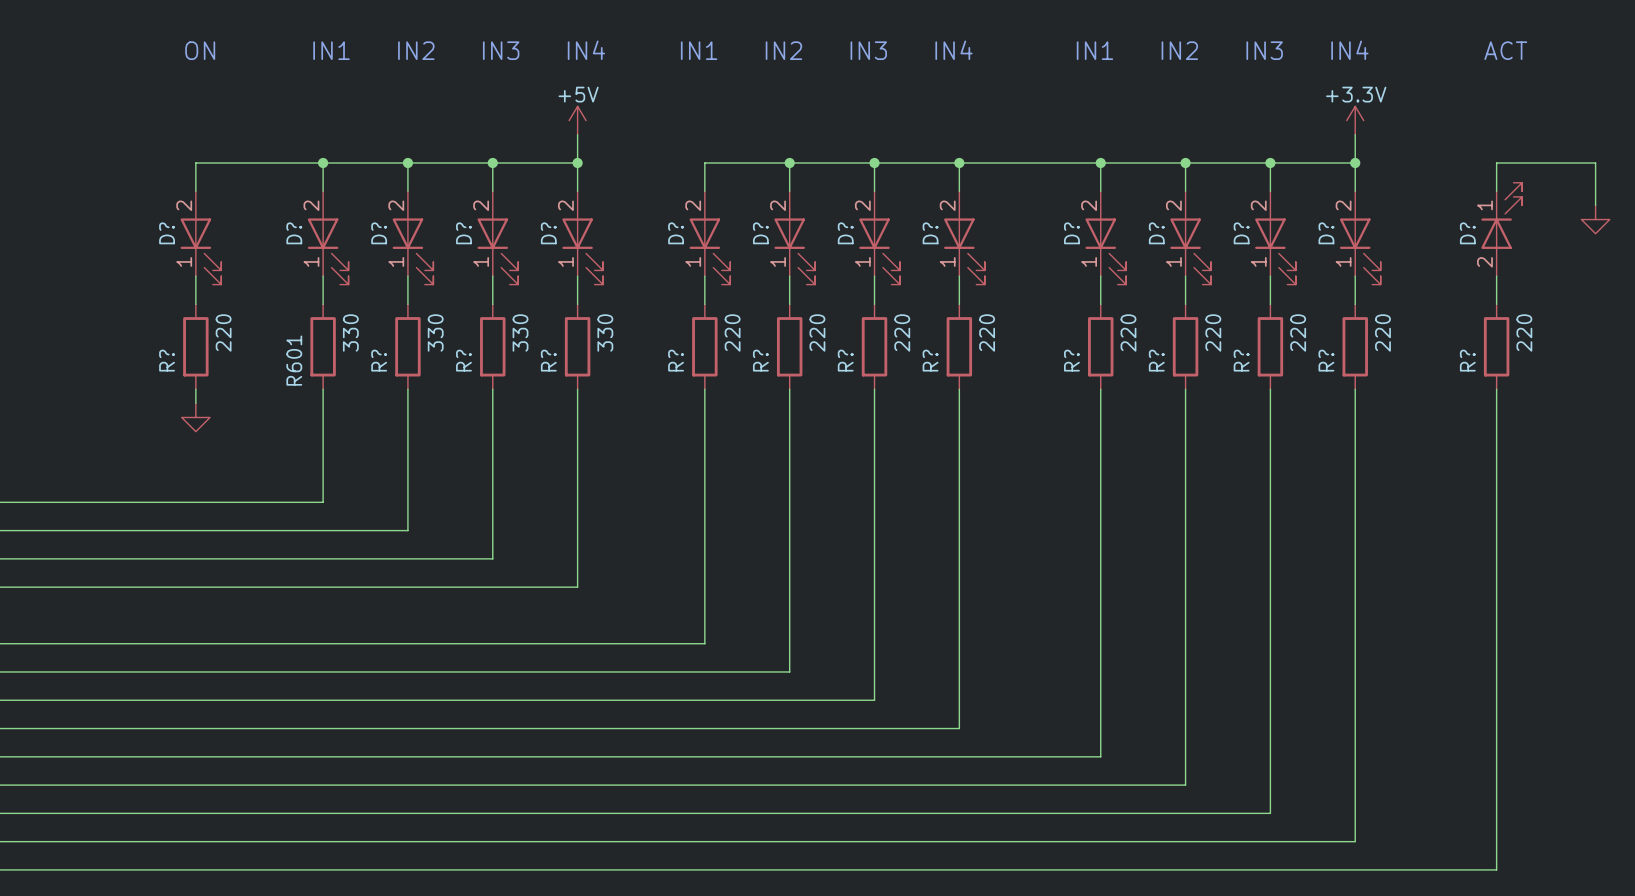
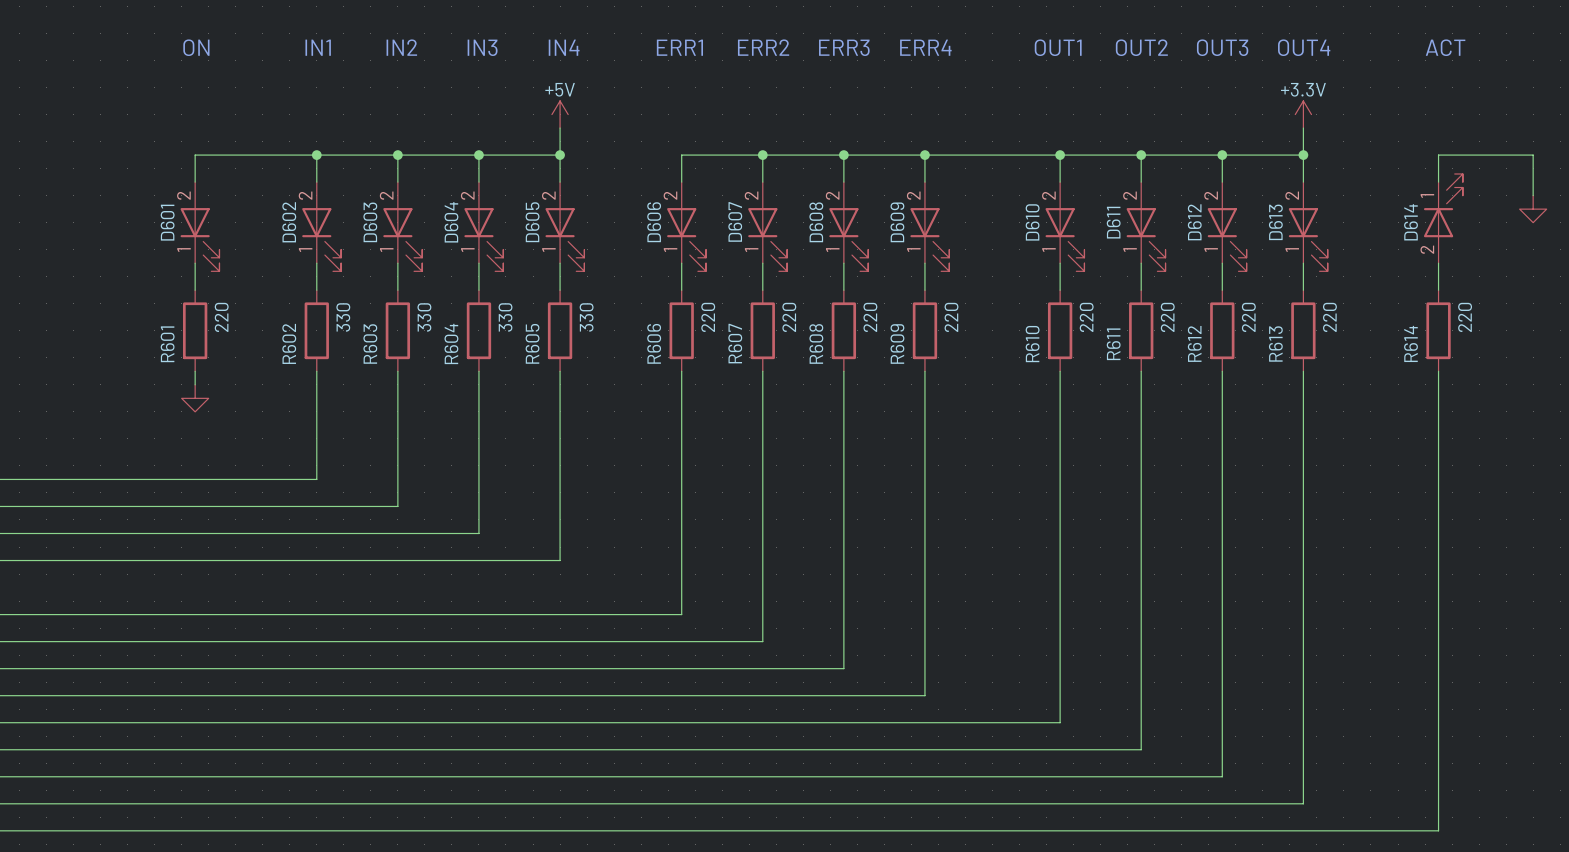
text: IN1 (699, 50) -> ERR1 (679, 47)
text: IN2 (783, 50) -> ERR2 (763, 47)
text: IN3 (868, 50) -> ERR3 (844, 47)
text: IN4 (954, 50) -> ERR4 (925, 47)
text: IN1 (1094, 50) -> OUT1 (1058, 47)
text: IN2 (1179, 50) -> OUT2 (1141, 47)
text: IN3 (1264, 50) -> OUT3 (1222, 47)
text: IN4 (1349, 50) -> OUT4 (1304, 47)
D? name: D? (167, 233) -> D601 (167, 222)
D? name: D? (294, 233) -> D602 (289, 222)
D? name: D? (379, 233) -> D603 (370, 222)
D? name: D? (463, 233) -> D604 (451, 222)
D? name: D? (548, 233) -> D605 (532, 222)
D? name: D? (676, 233) -> D606 (654, 222)
D? name: D? (760, 233) -> D607 (735, 221)
D? name: D? (845, 233) -> D608 (816, 222)
D? name: D? (930, 233) -> D609 (897, 222)
D? name: D? (1071, 233) -> D610 (1032, 222)
D? name: D? (1156, 233) -> D611 (1113, 222)
D? name: D? (1241, 233) -> D612 (1194, 222)
D? name: D? (1326, 233) -> D613 (1275, 222)
D? name: D? (1467, 233) -> D614 (1411, 222)
R? name: R? (167, 360) -> R601 (167, 344)
R601 name: R601 (294, 360) -> R602 (289, 343)
R? name: R? (379, 360) -> R603 (370, 344)
R? name: R? (463, 360) -> R604 (451, 343)
R? name: R? (548, 360) -> R605 (532, 343)
R? name: R? (676, 360) -> R606 (654, 343)
R? name: R? (760, 360) -> R607 (735, 343)
R? name: R? (845, 360) -> R608 (816, 343)
R? name: R? (930, 360) -> R609 (897, 344)
R? name: R? (1071, 360) -> R610 (1032, 344)
R? name: R? (1156, 360) -> R611 (1113, 344)
R? name: R? (1241, 360) -> R612 (1194, 343)
R? name: R? (1326, 360) -> R613 (1275, 344)
R? name: R? (1467, 360) -> R614 (1411, 343)

